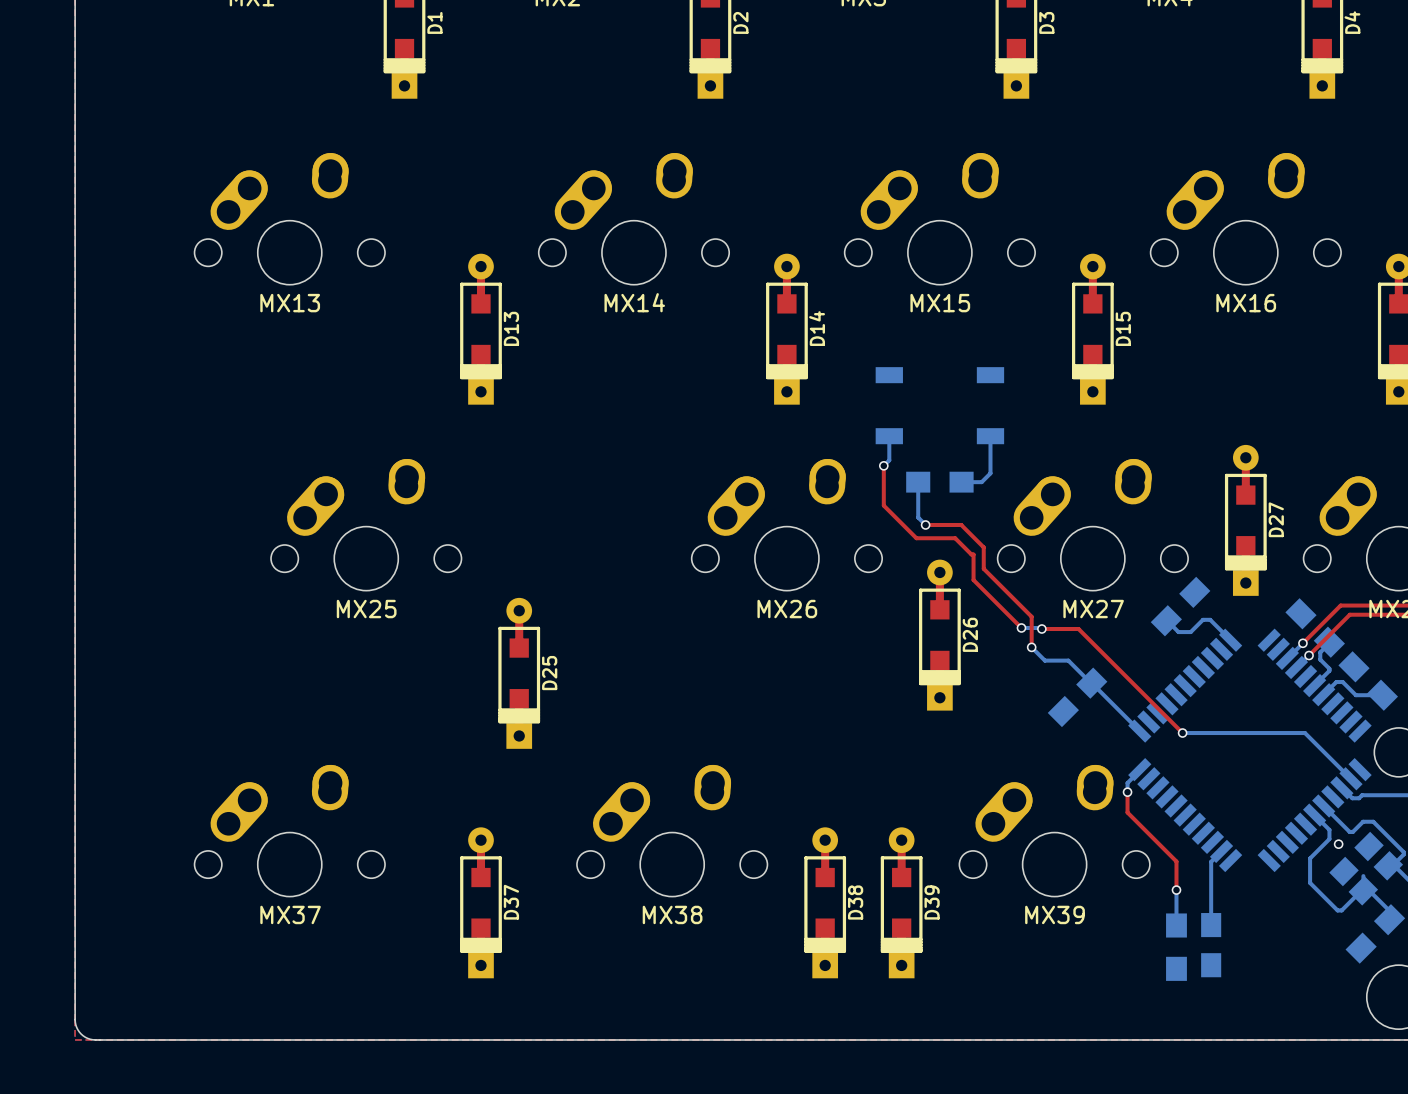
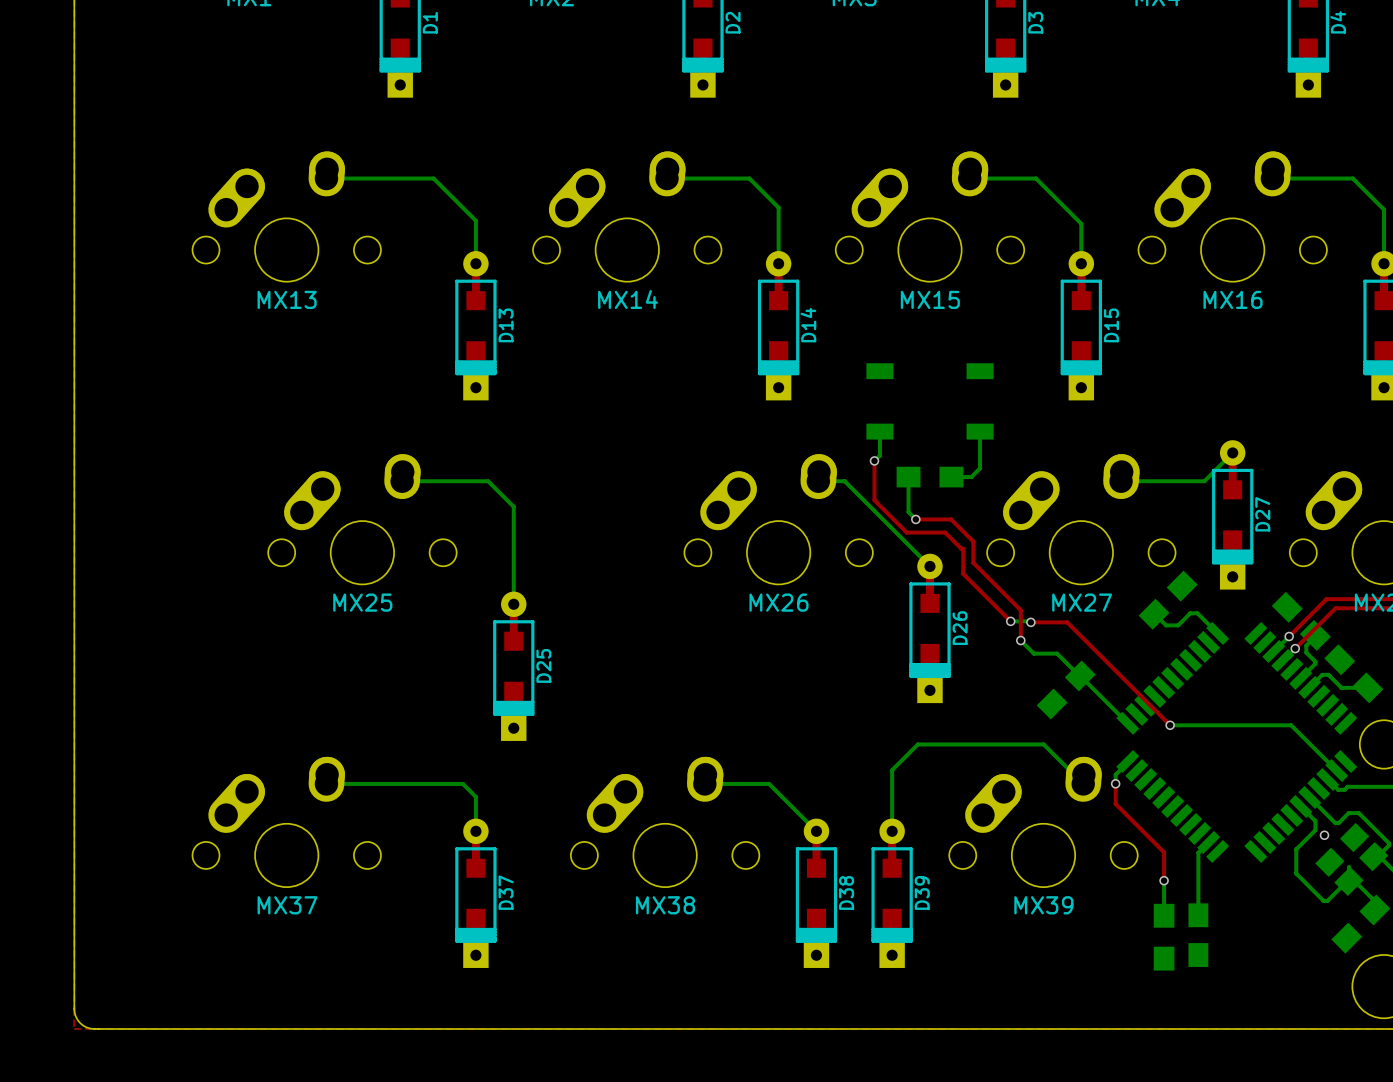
bottom track: none -> (326, 178) (433, 178) (475, 220) (475, 263)
bottom track: none -> (667, 178) (749, 178) (778, 207) (778, 263)
bottom track: none -> (969, 178) (1036, 178) (1081, 223) (1081, 263)
bottom track: none -> (1272, 178) (1352, 178) (1384, 209) (1384, 263)
bottom track: none -> (1232, 452) (1204, 481) (1121, 481)
bottom track: none -> (402, 481) (488, 481) (513, 506) (513, 604)
bottom track: none -> (818, 481) (844, 481) (929, 566)
bottom track: none -> (326, 783) (462, 783) (475, 796) (475, 831)
bottom track: none -> (704, 783) (769, 783) (816, 831)
bottom track: none -> (1083, 783) (1043, 744) (917, 744) (892, 770) (892, 831)

